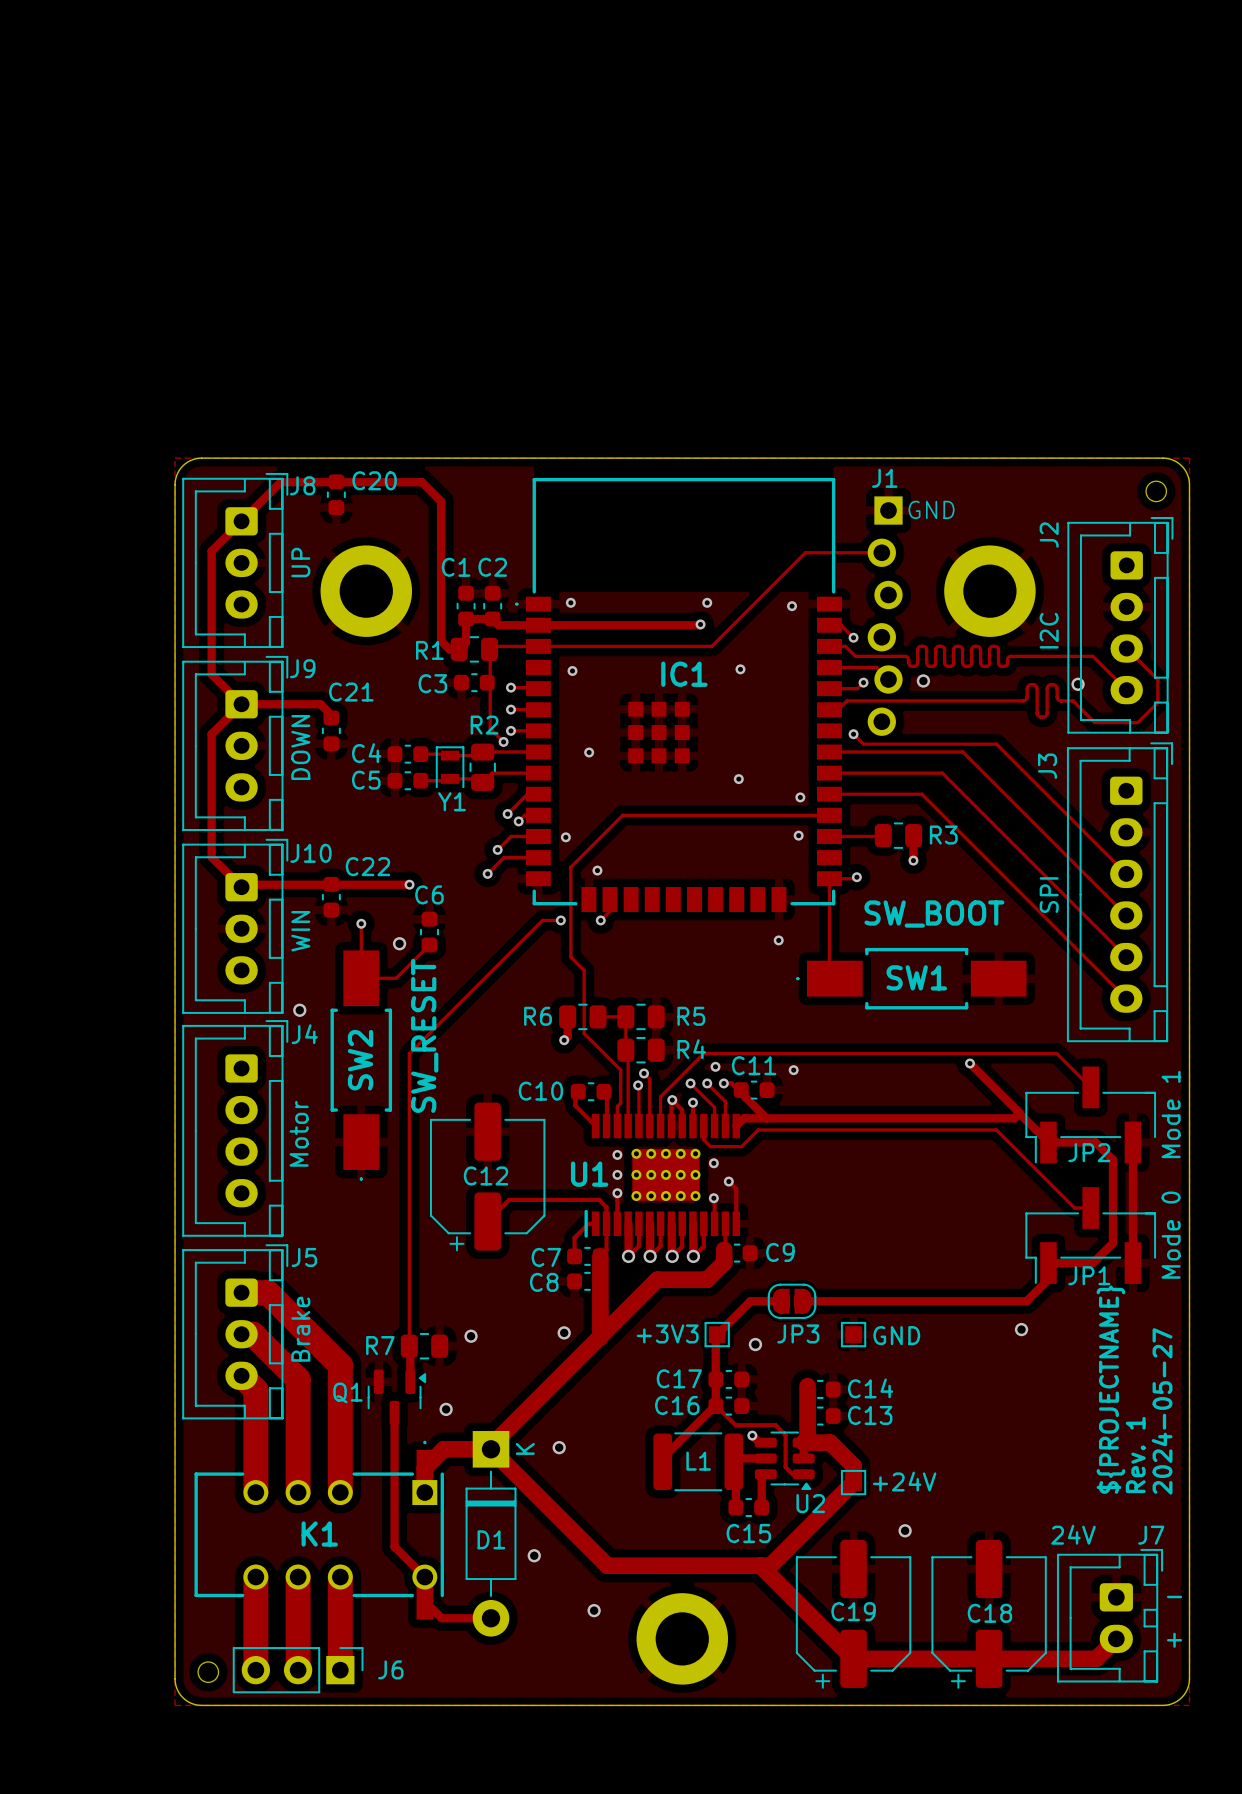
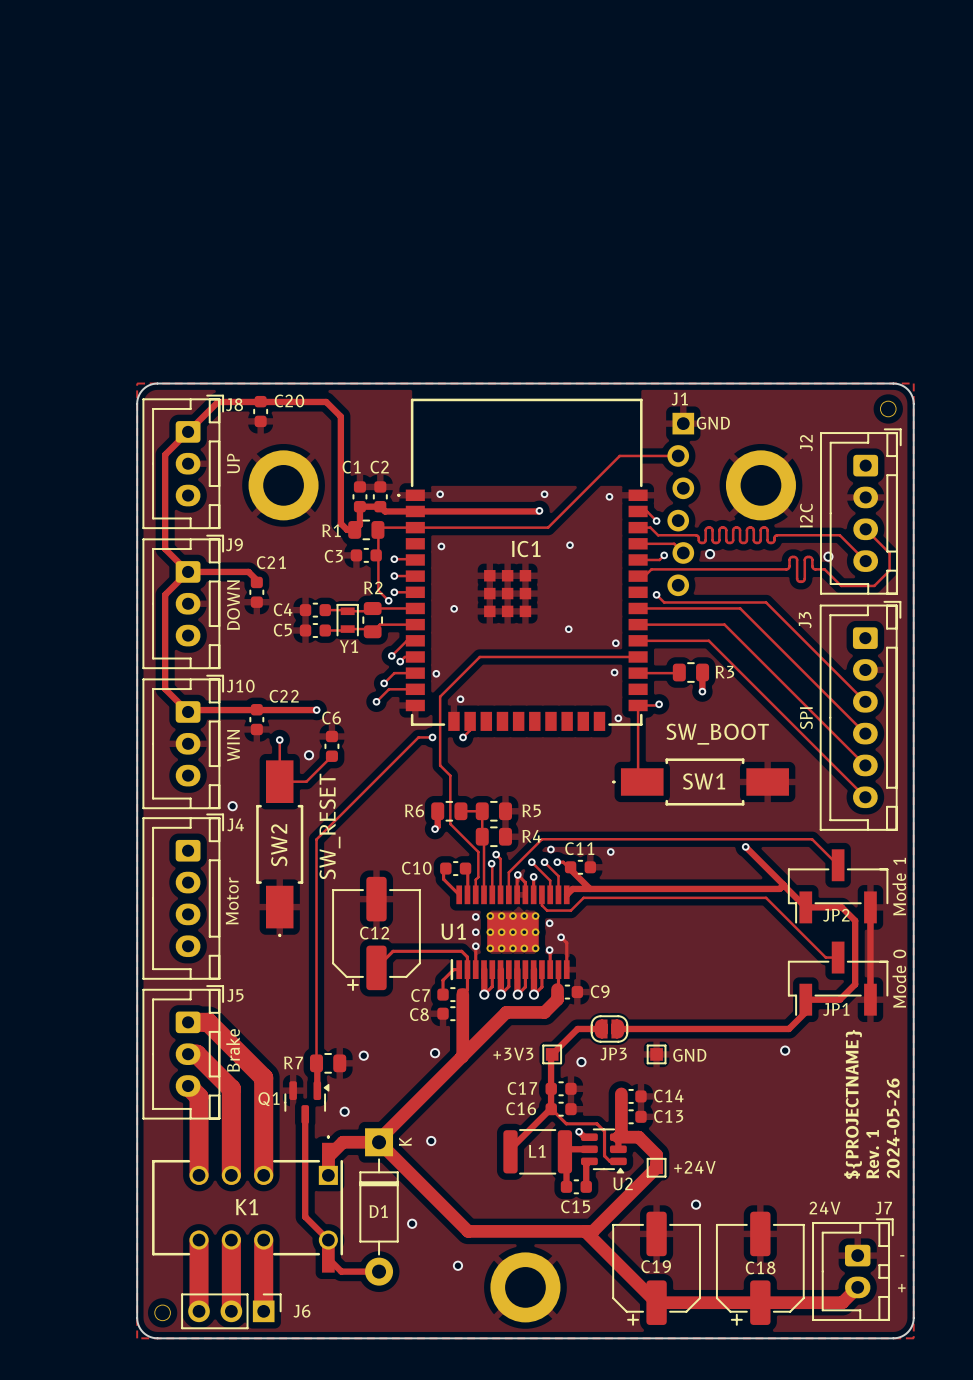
via position: (778, 940) -> (618, 718)
text: 2024-05-27 (1162, 1411) -> 2024-05-26 (893, 1128)

